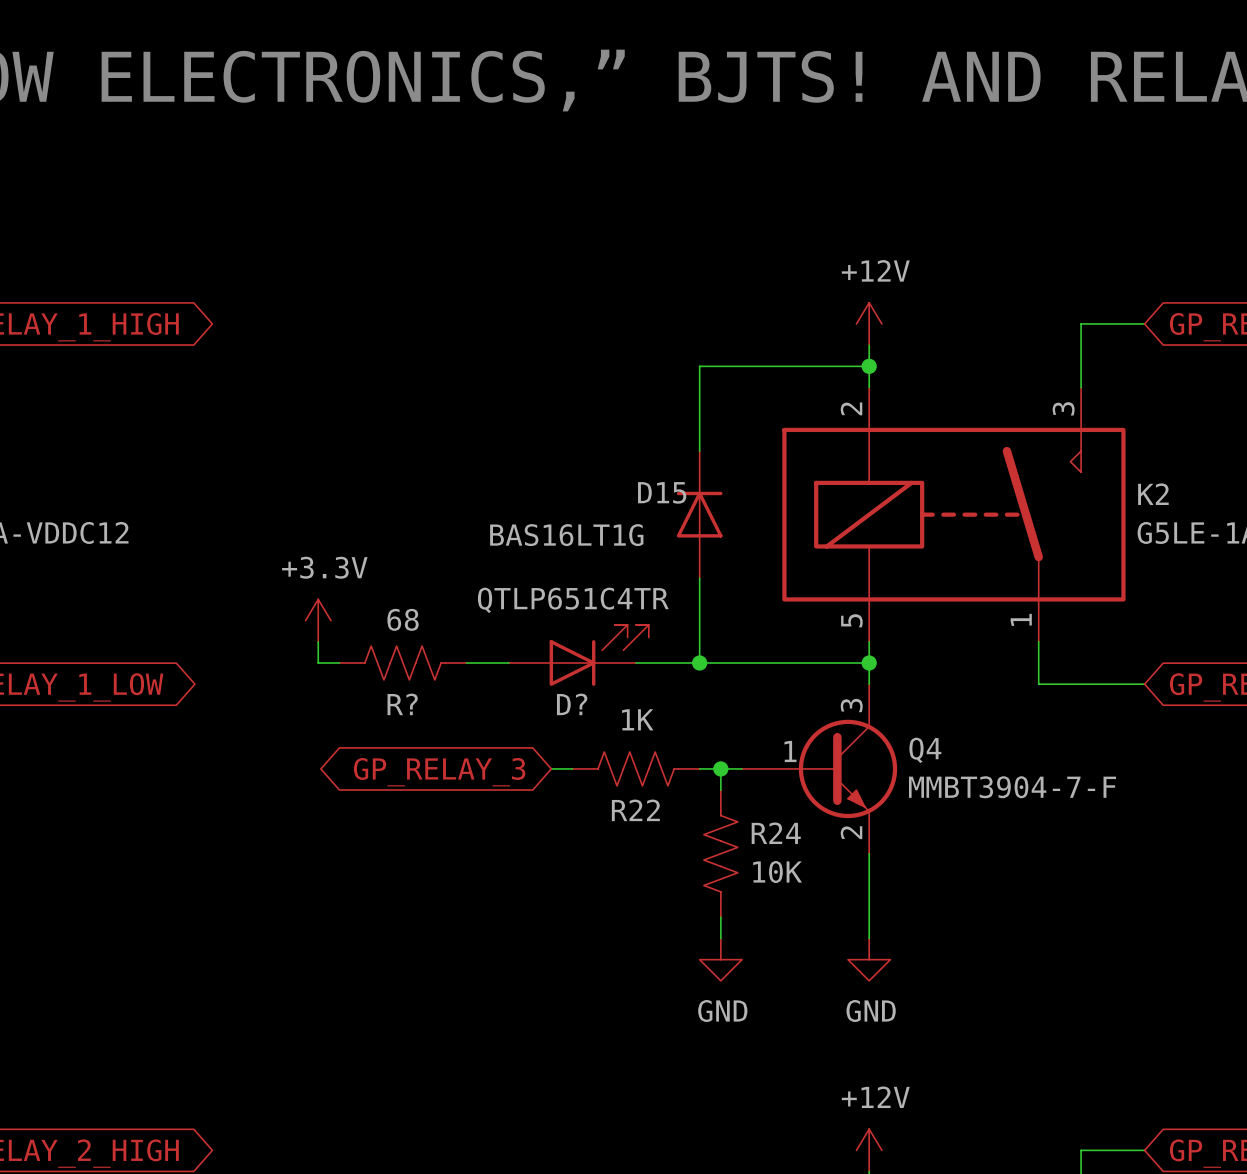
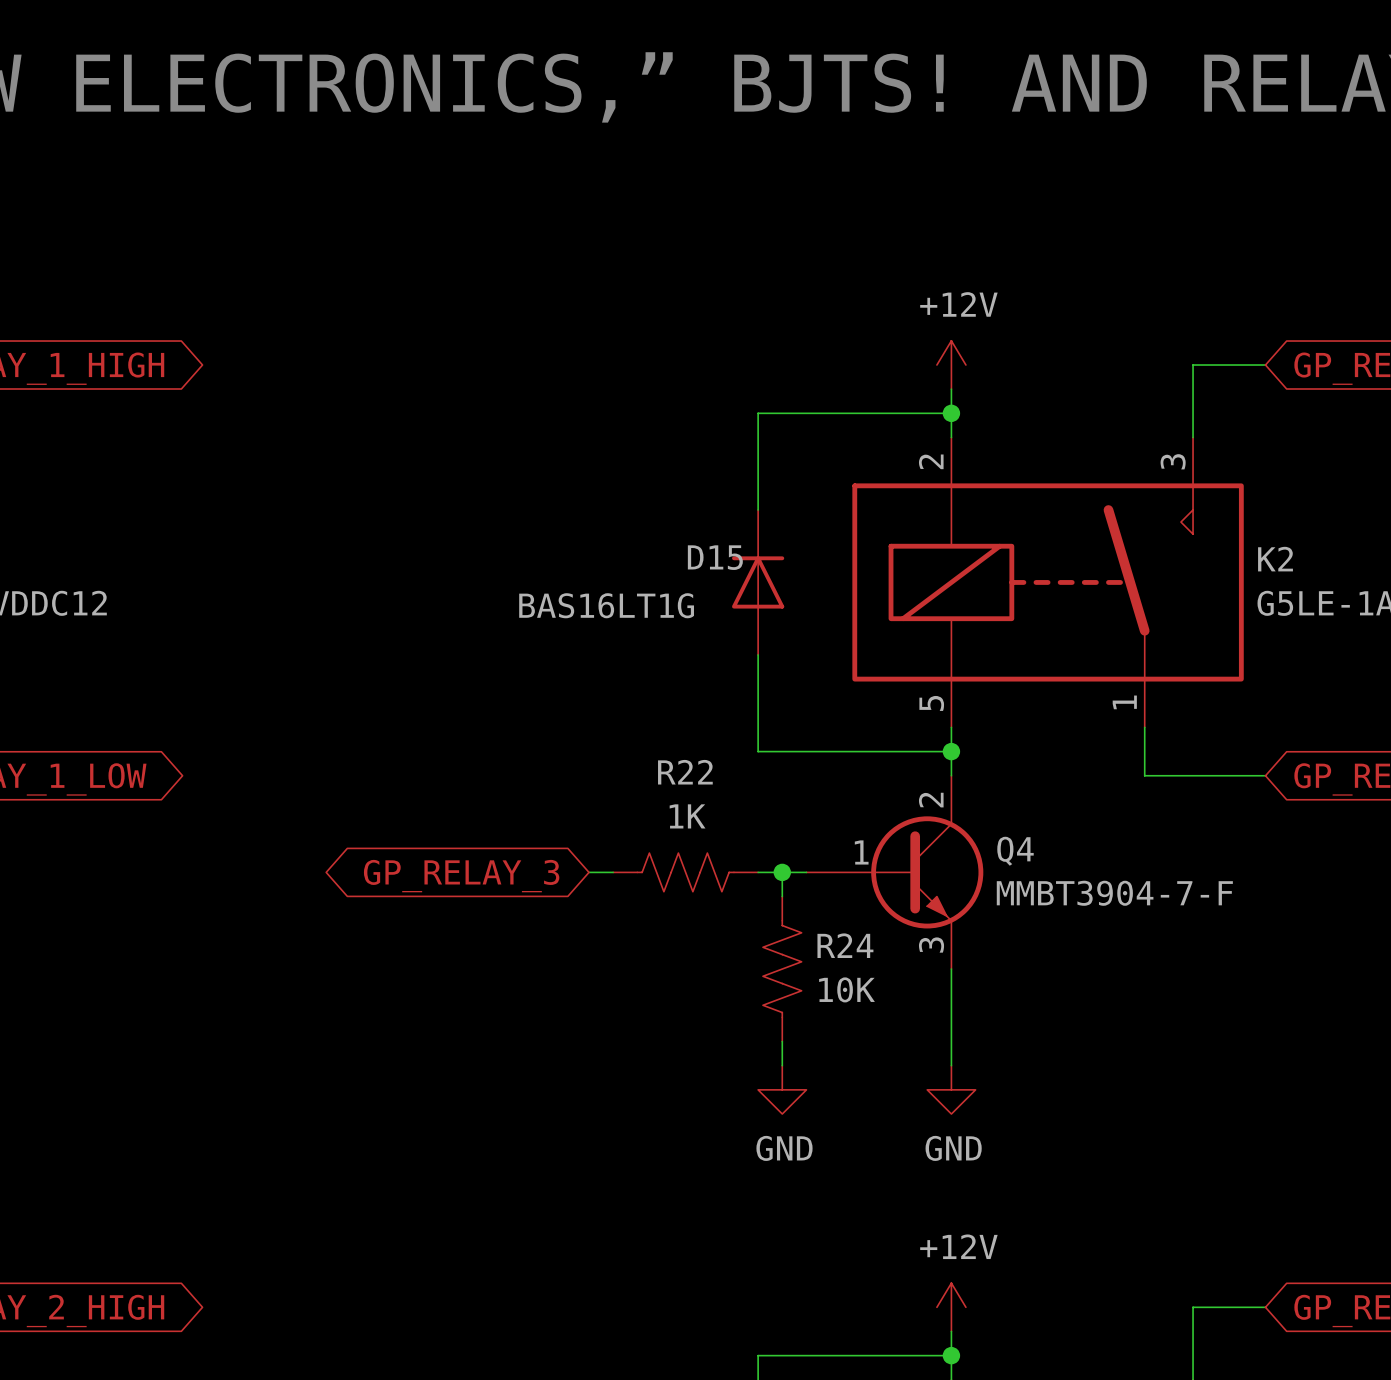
power symbol: +3.3V (318, 620) -> none
wire: (318, 641) (318, 663) (339, 663) -> none
D?: QTLP651C4TR (578, 655) -> none
R?: 68 (403, 663) -> none
wire: (466, 663) (508, 663) -> none
wire: (636, 663) (699, 663) -> none
junction: (699, 663) -> none
Q4 pin number: 3 (851, 705) -> 2 (931, 800)
R22 name position: R22 (635, 810) -> R22 (685, 772)
Q4 pin number: 2 (851, 832) -> 3 (931, 945)

